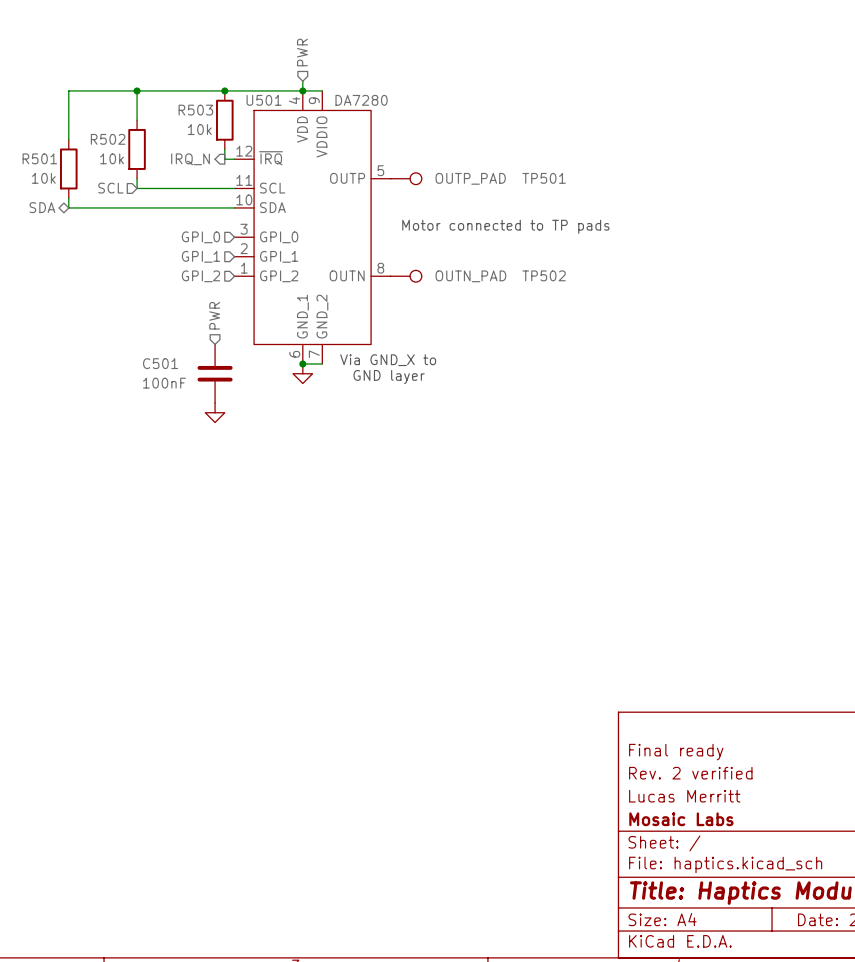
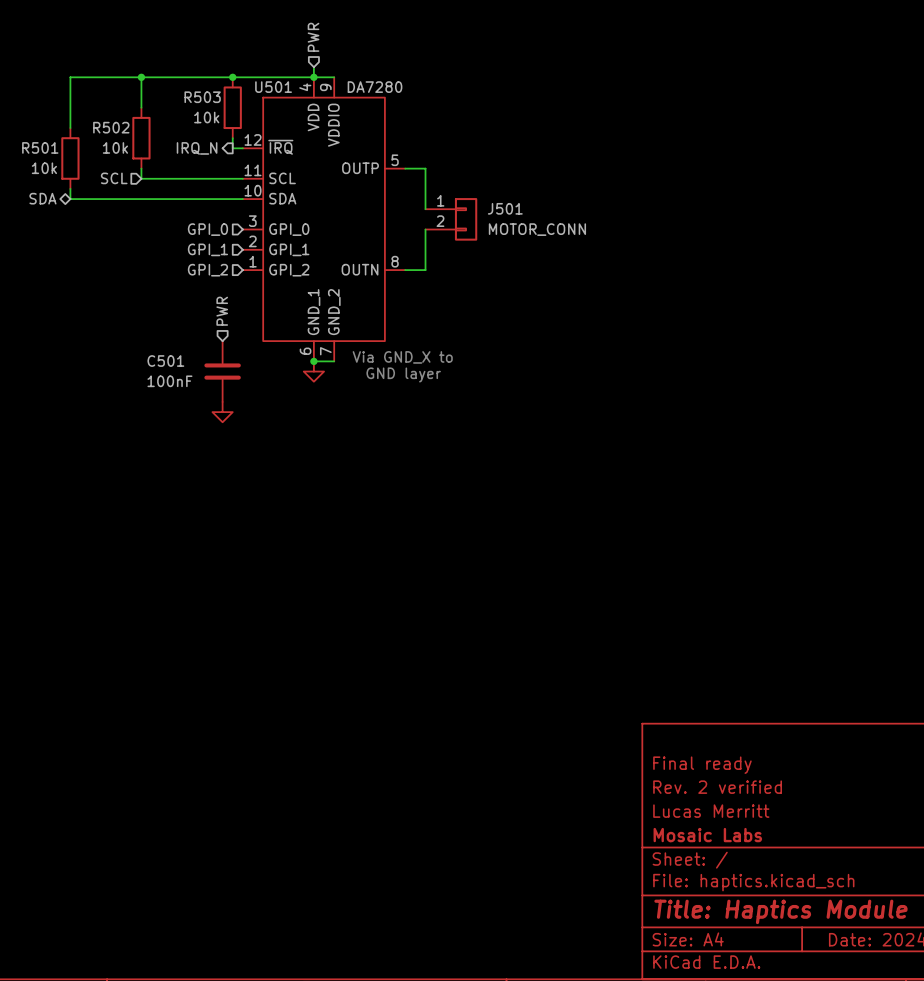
wire: none -> (405, 168) (425, 168) (425, 209)
TP501: OUTP_PAD (406, 178) -> none
text: Motor connected to TP pads (505, 226) -> none
J501: none -> MOTOR_CONN (451, 219)
wire: none -> (425, 229) (425, 270) (405, 270)
TP502: OUTN_PAD (406, 276) -> none

